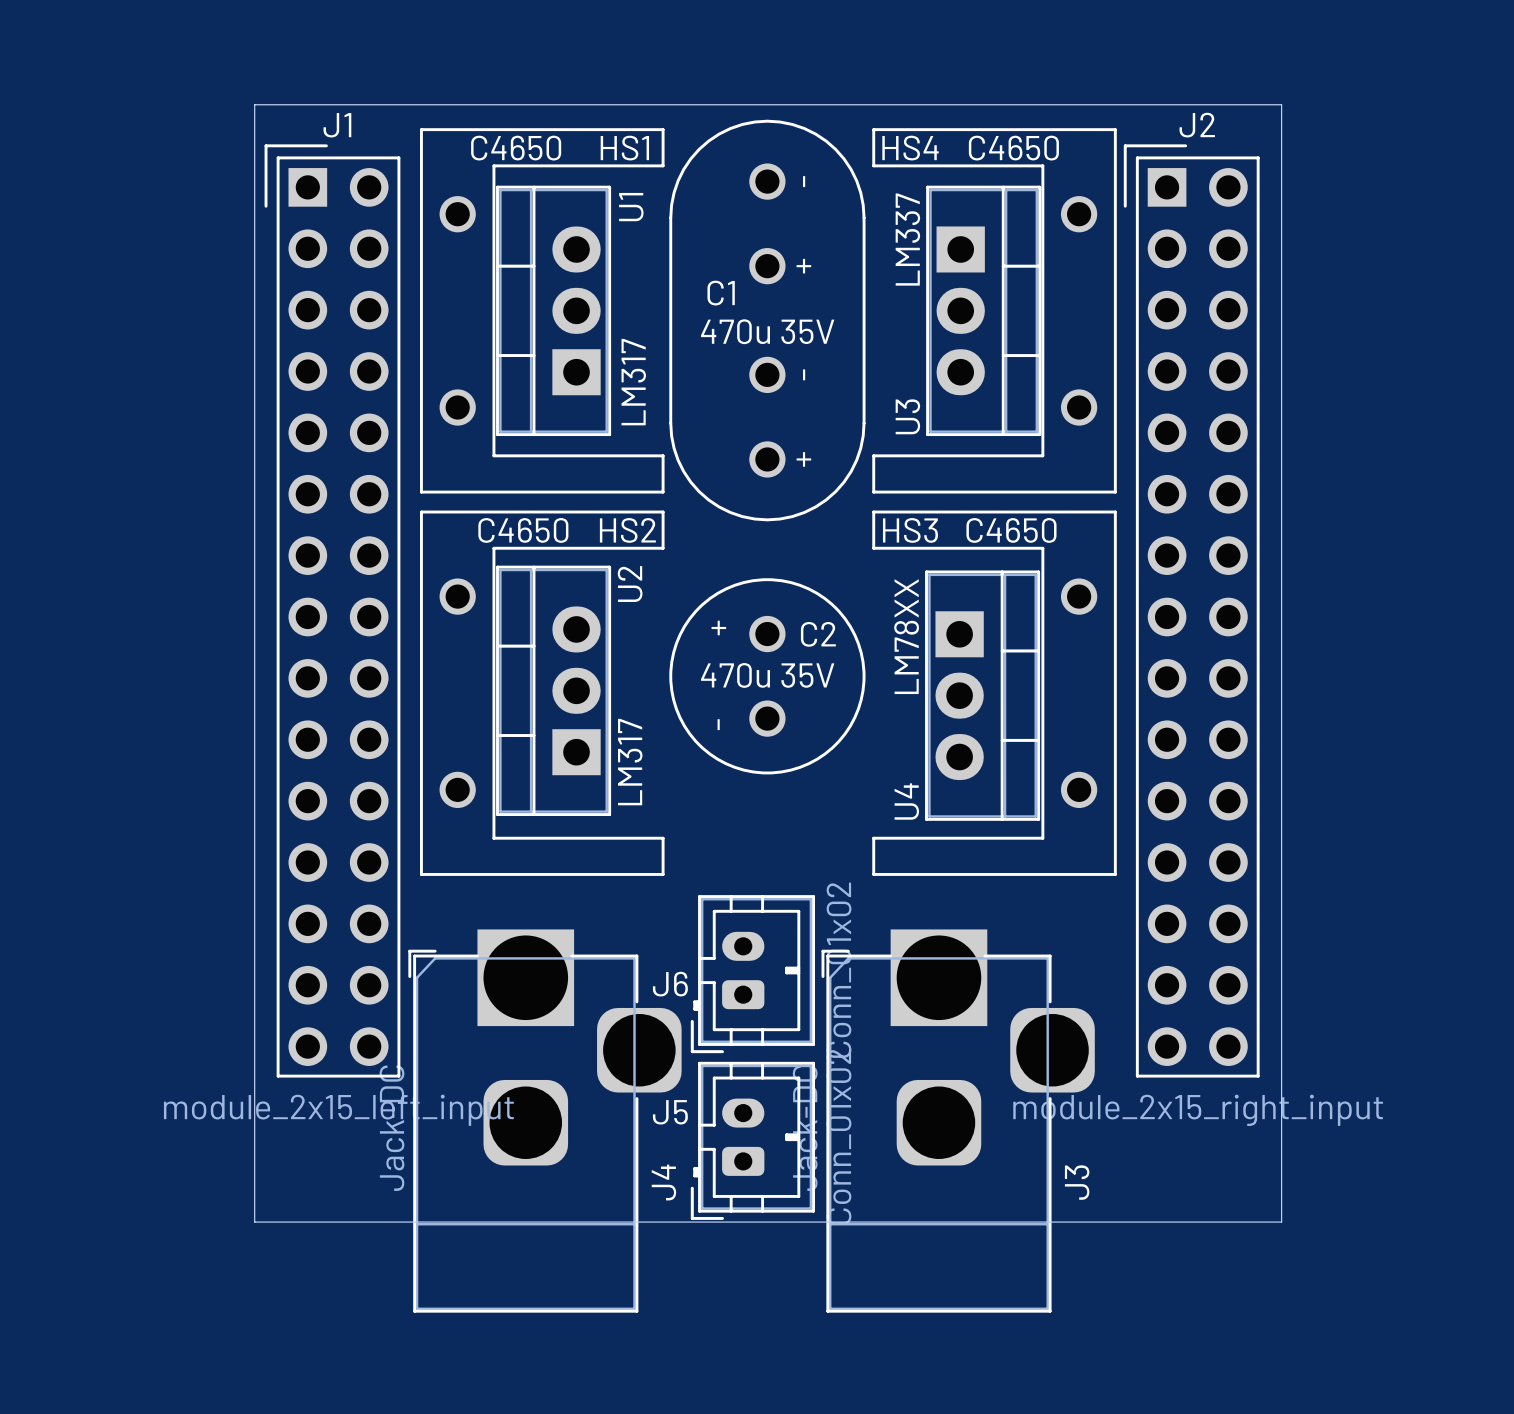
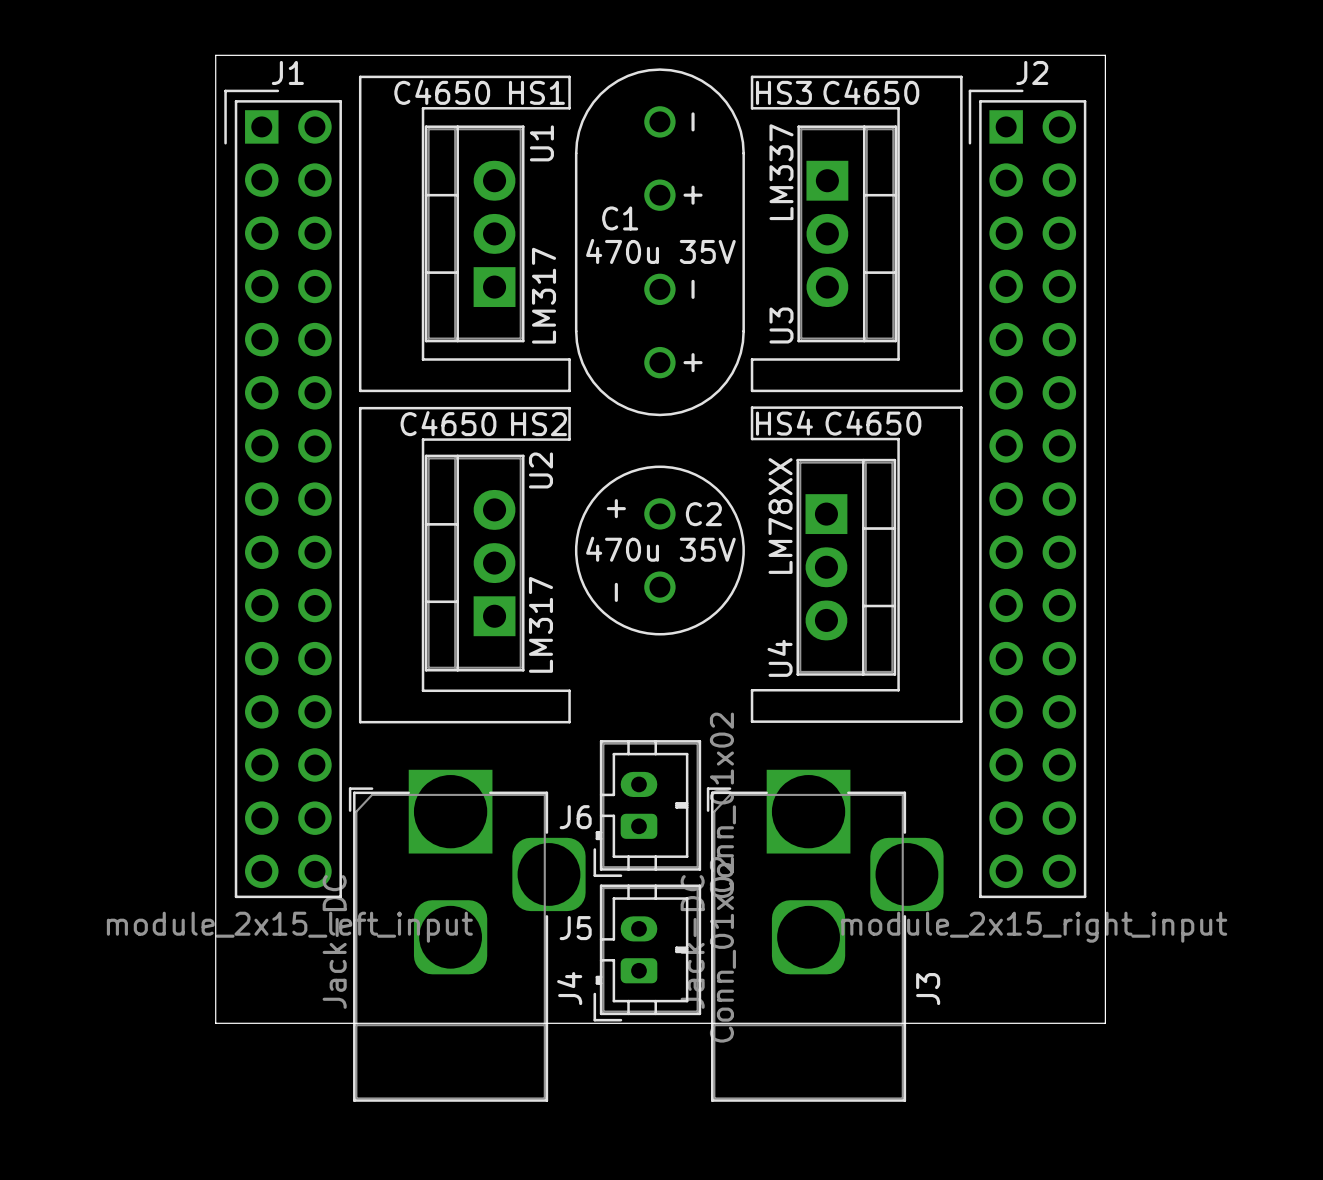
HS1 footprint: [420, 128, 665, 494] -> [358, 75, 571, 393]
HS4 footprint: [872, 128, 1117, 494] -> [750, 406, 963, 723]
HS2 footprint: [420, 510, 665, 876] -> [358, 406, 571, 724]
HS3 footprint: [872, 510, 1117, 876] -> [750, 75, 963, 393]

